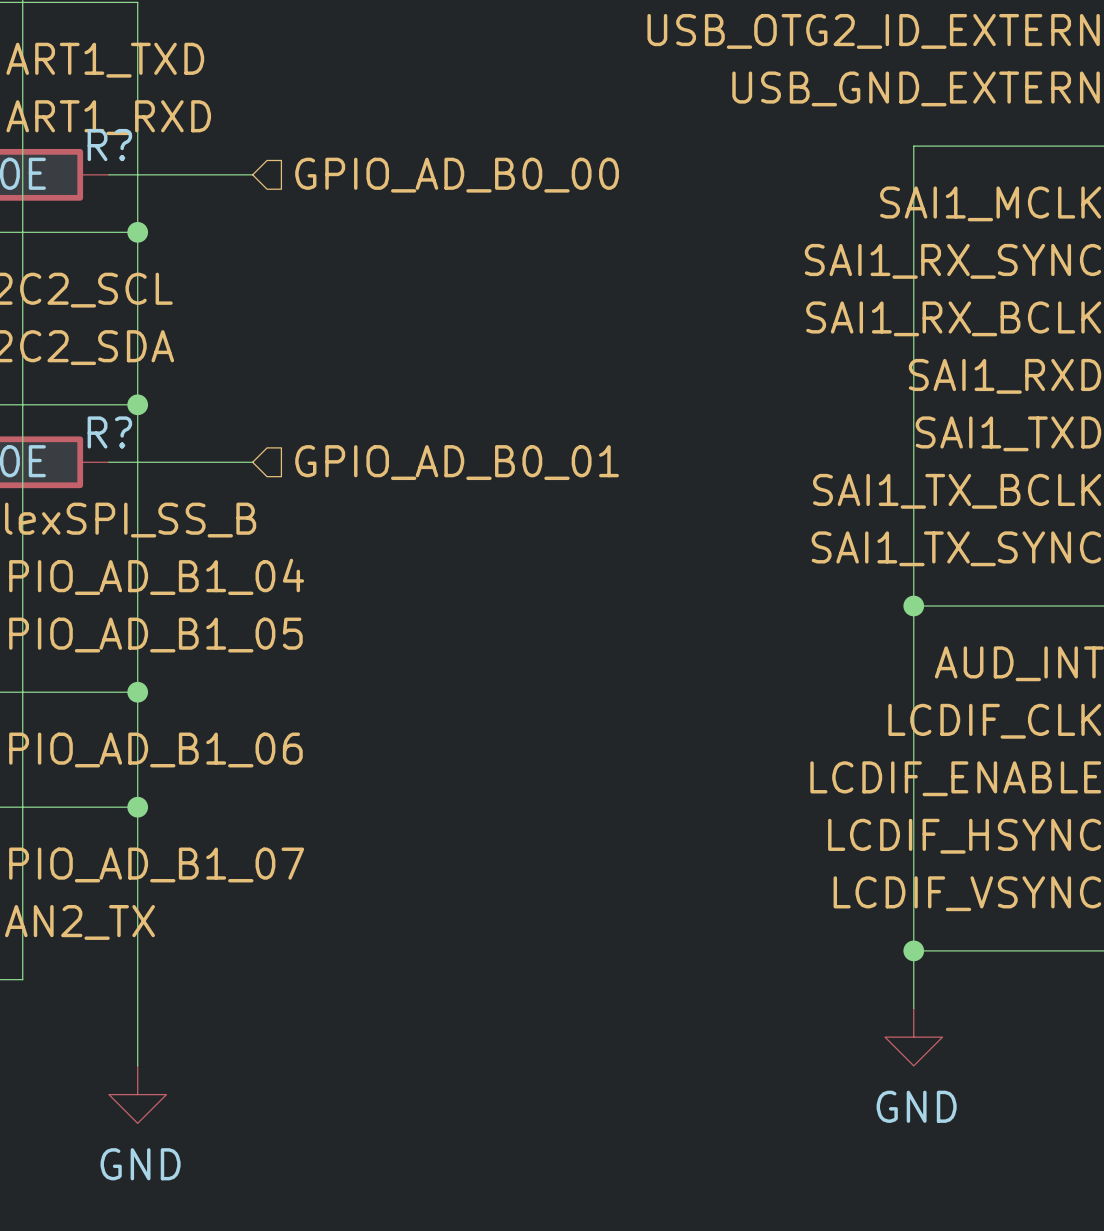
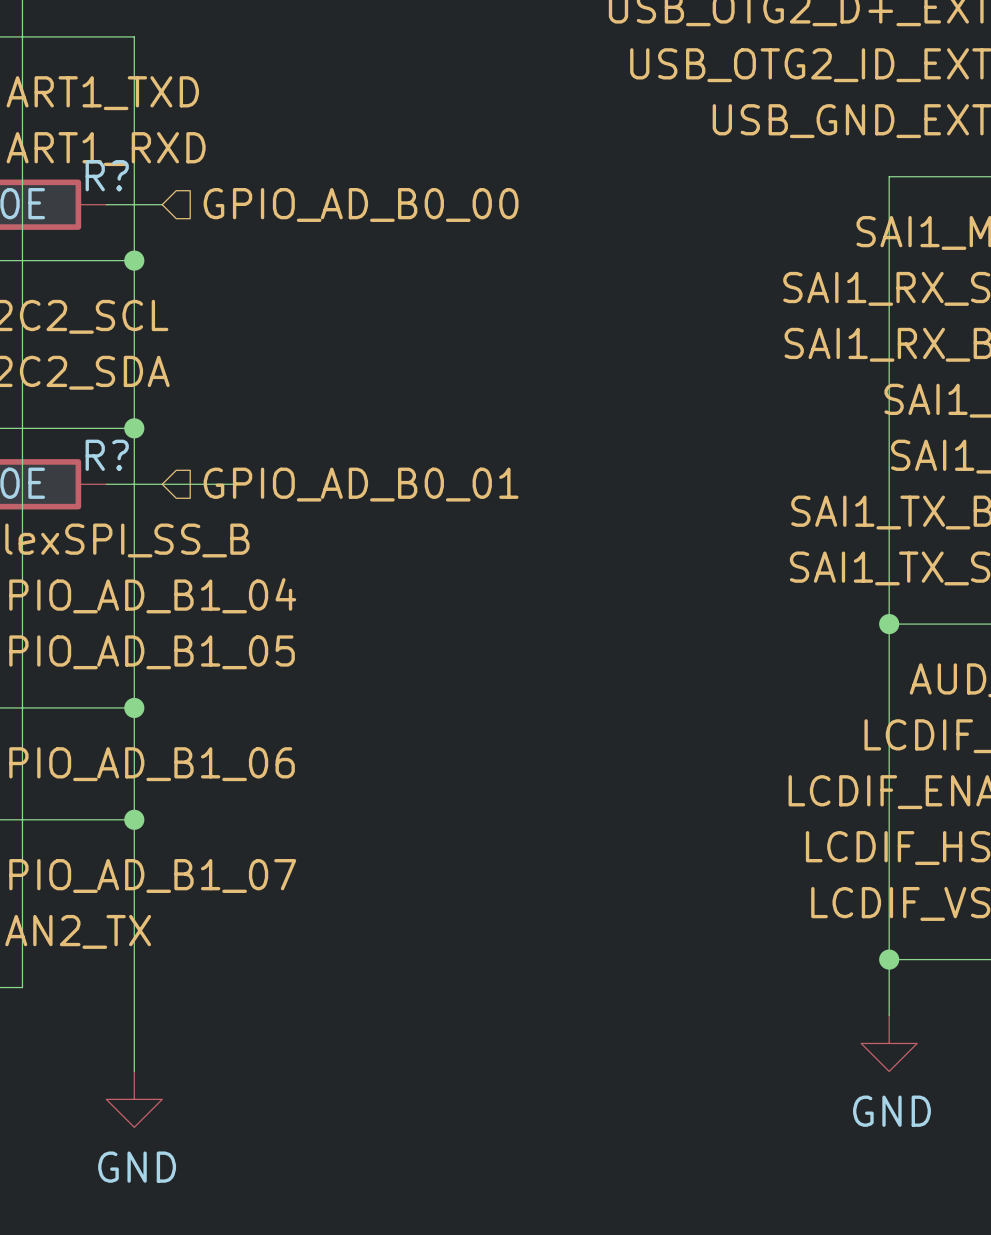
wire: (166, 174) (252, 174) -> none
hierarchical label position: GPIO_AD_B0_00 (457, 175) -> GPIO_AD_B0_00 (361, 204)
hierarchical label position: GPIO_AD_B0_01 (457, 462) -> GPIO_AD_B0_01 (361, 484)

